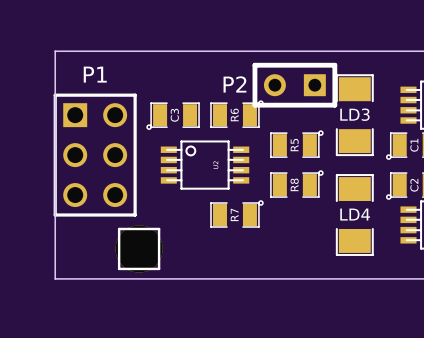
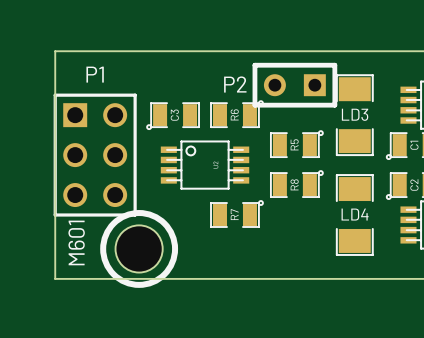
part: (139, 248) -> none
M601: none -> (139, 248)

